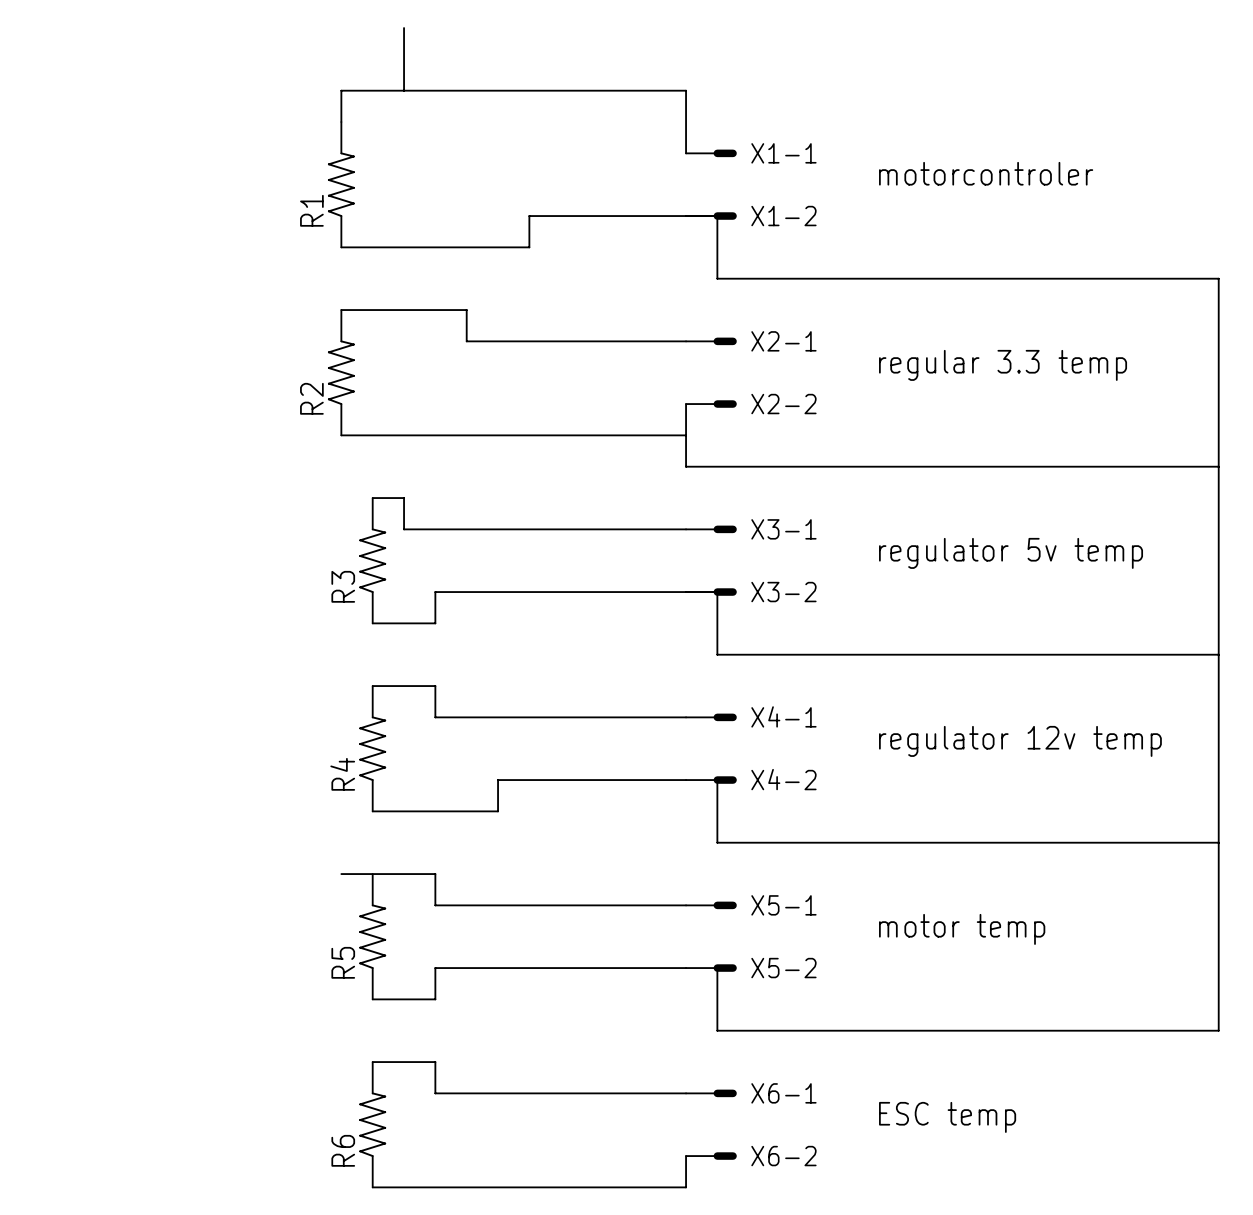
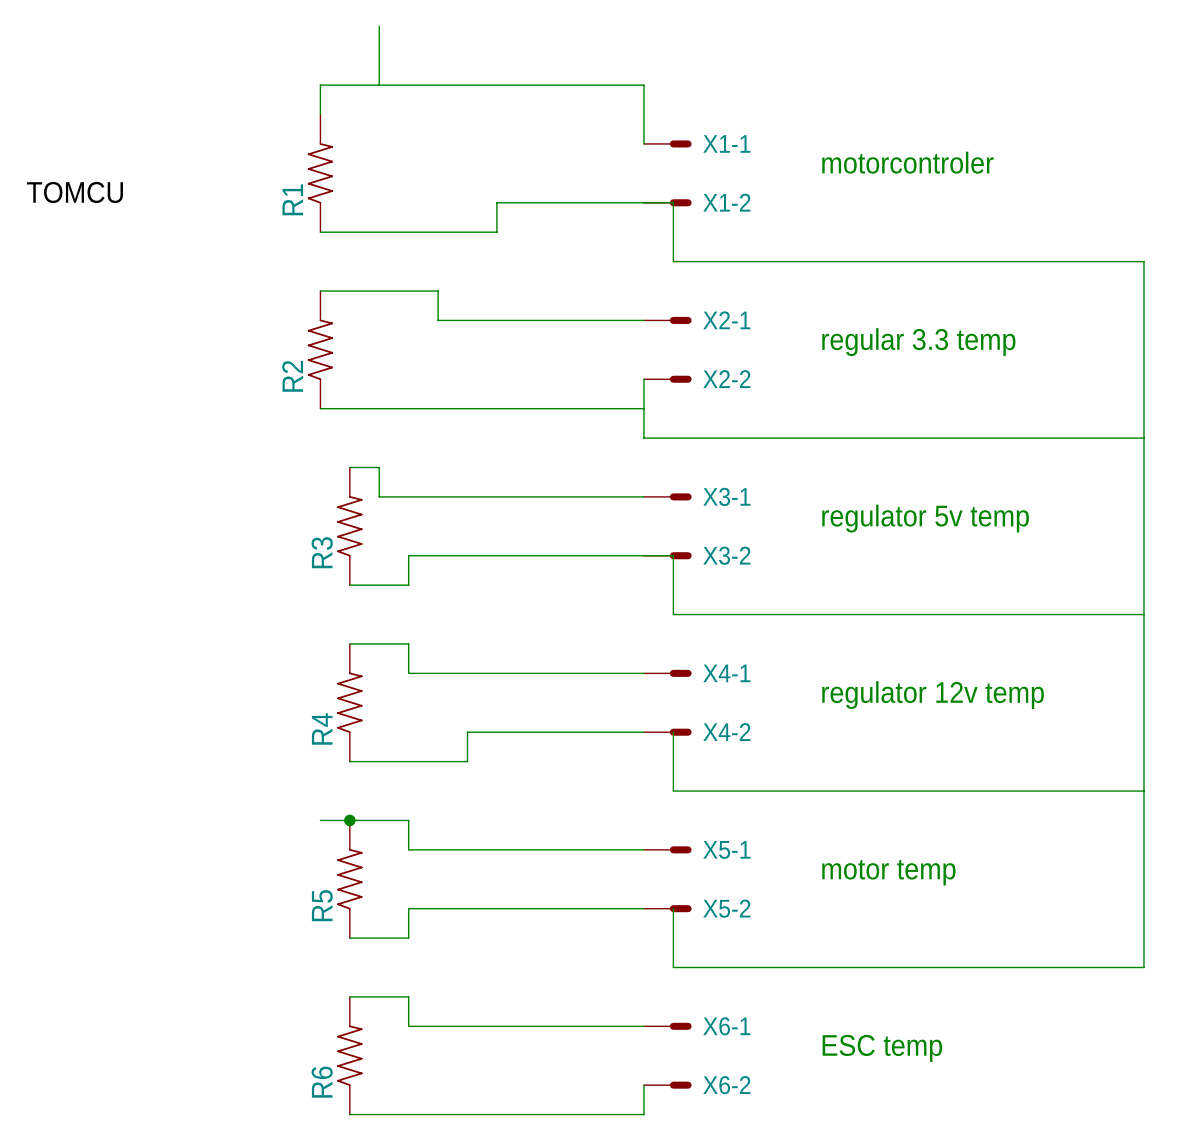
label: none -> TOMCU (74, 192)
junction: none -> (349, 820)

